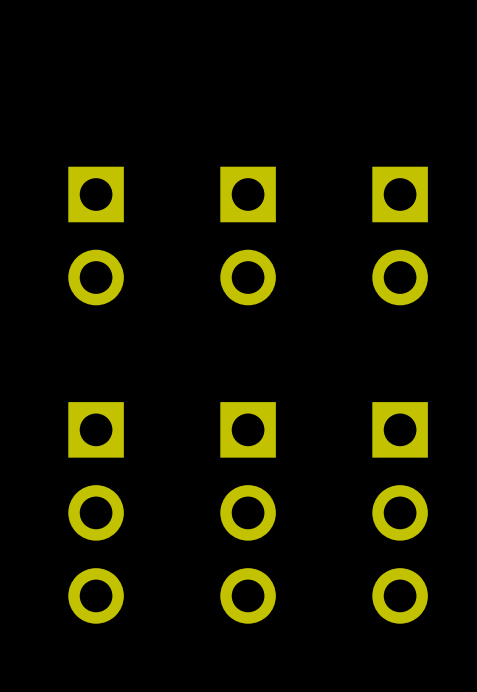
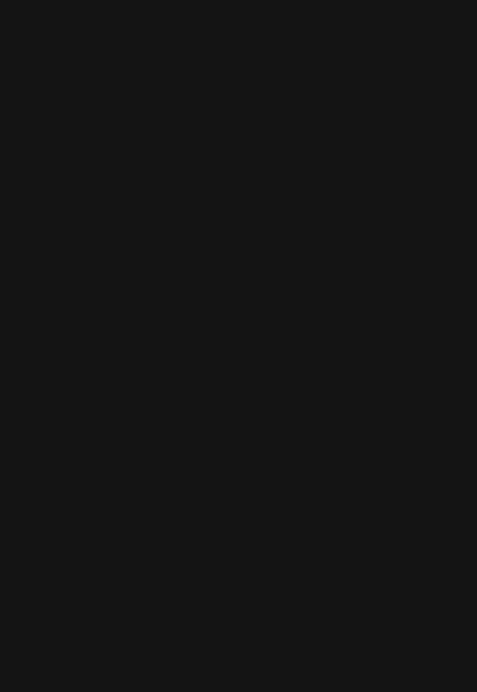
part: (96, 236) -> none
part: (248, 236) -> none
part: (400, 236) -> none
part: (96, 512) -> none
part: (248, 512) -> none
part: (400, 512) -> none

